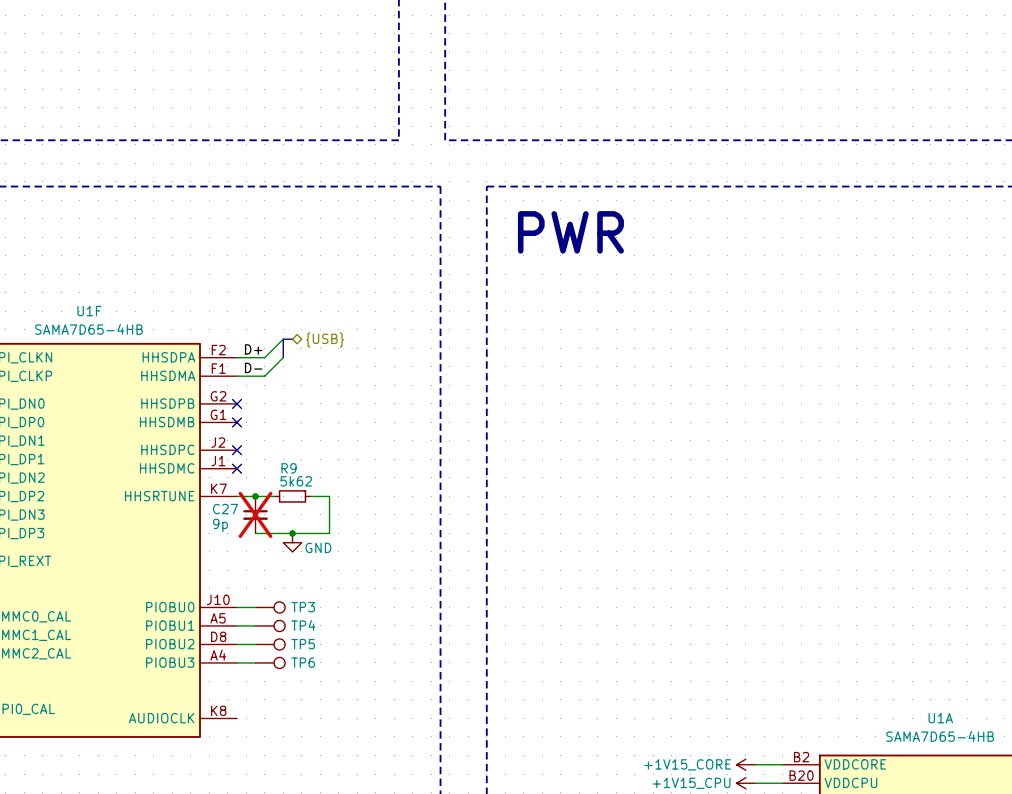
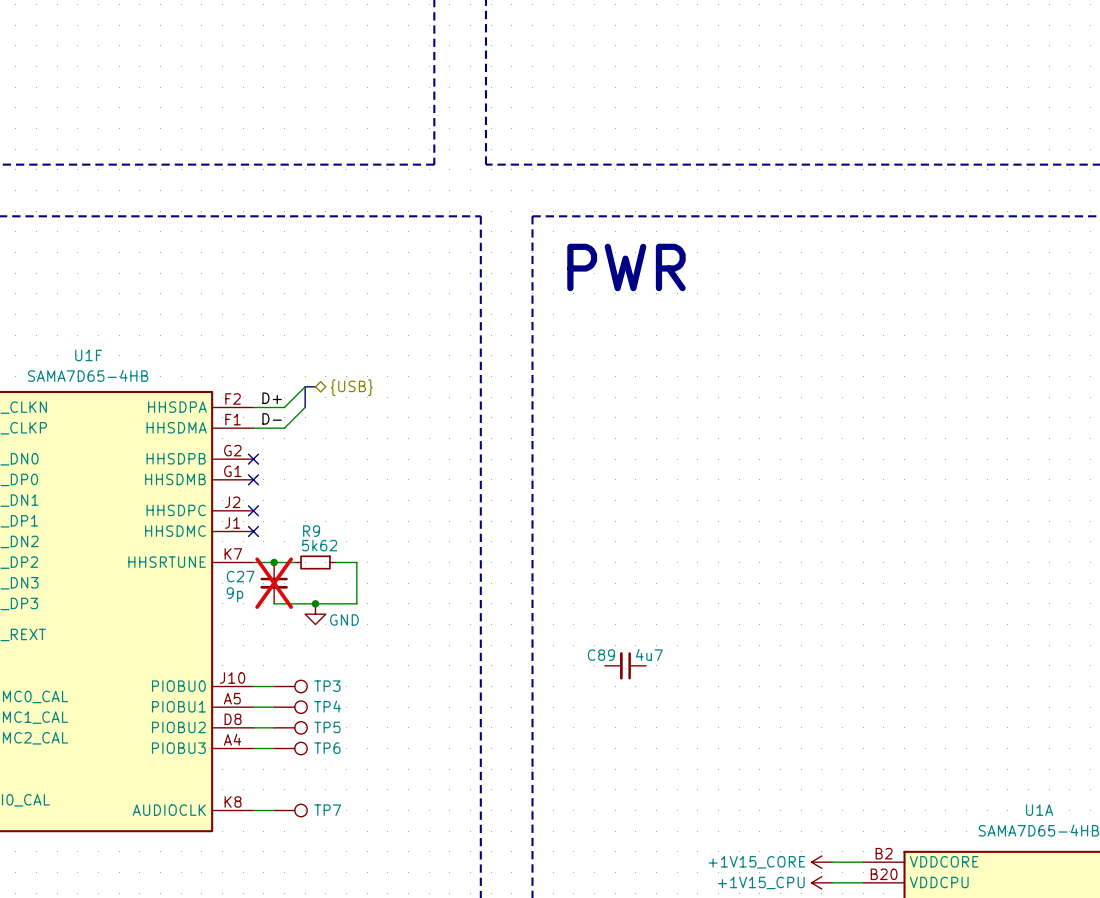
C89: none -> 4u7 (625, 665)
wire: none -> (253, 810) (274, 810)
TP7: none -> (290, 810)

